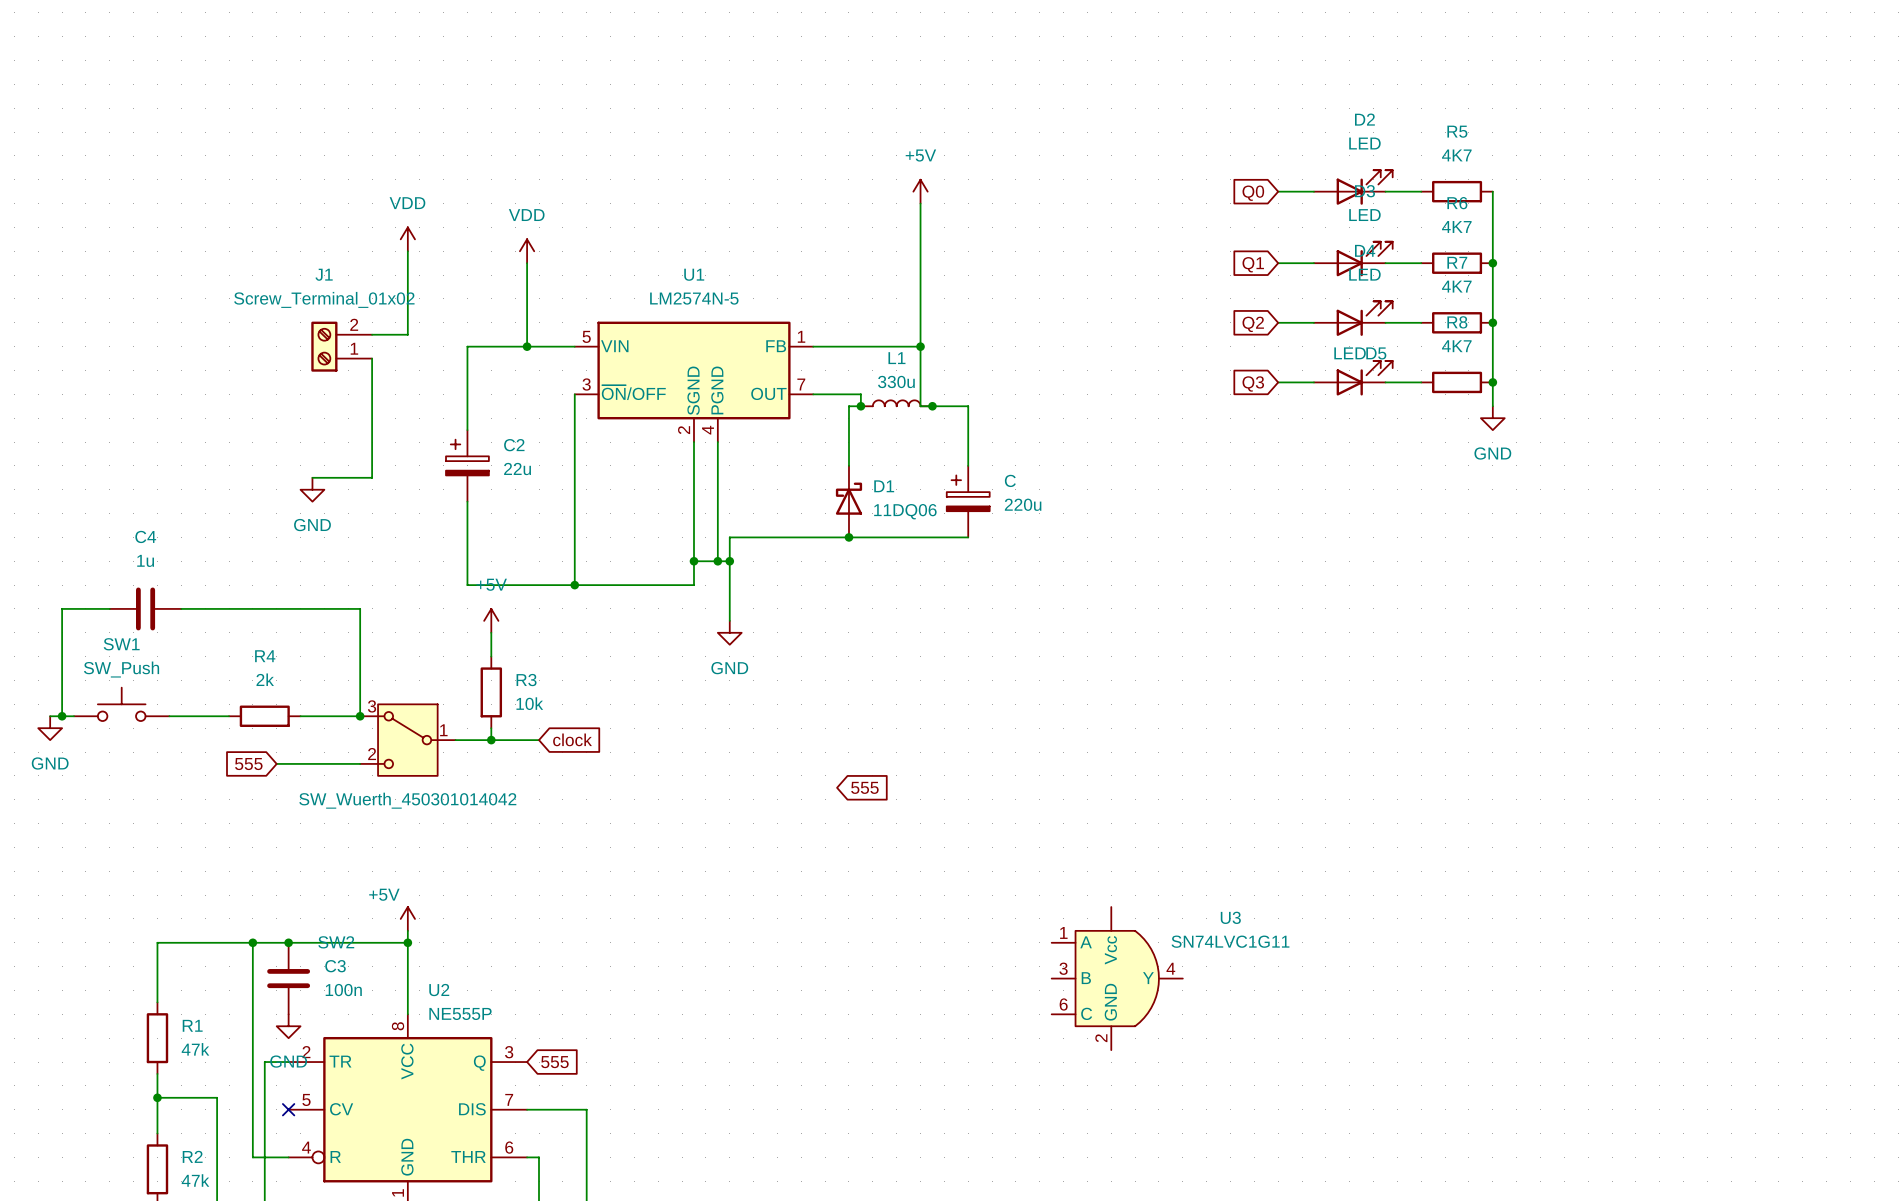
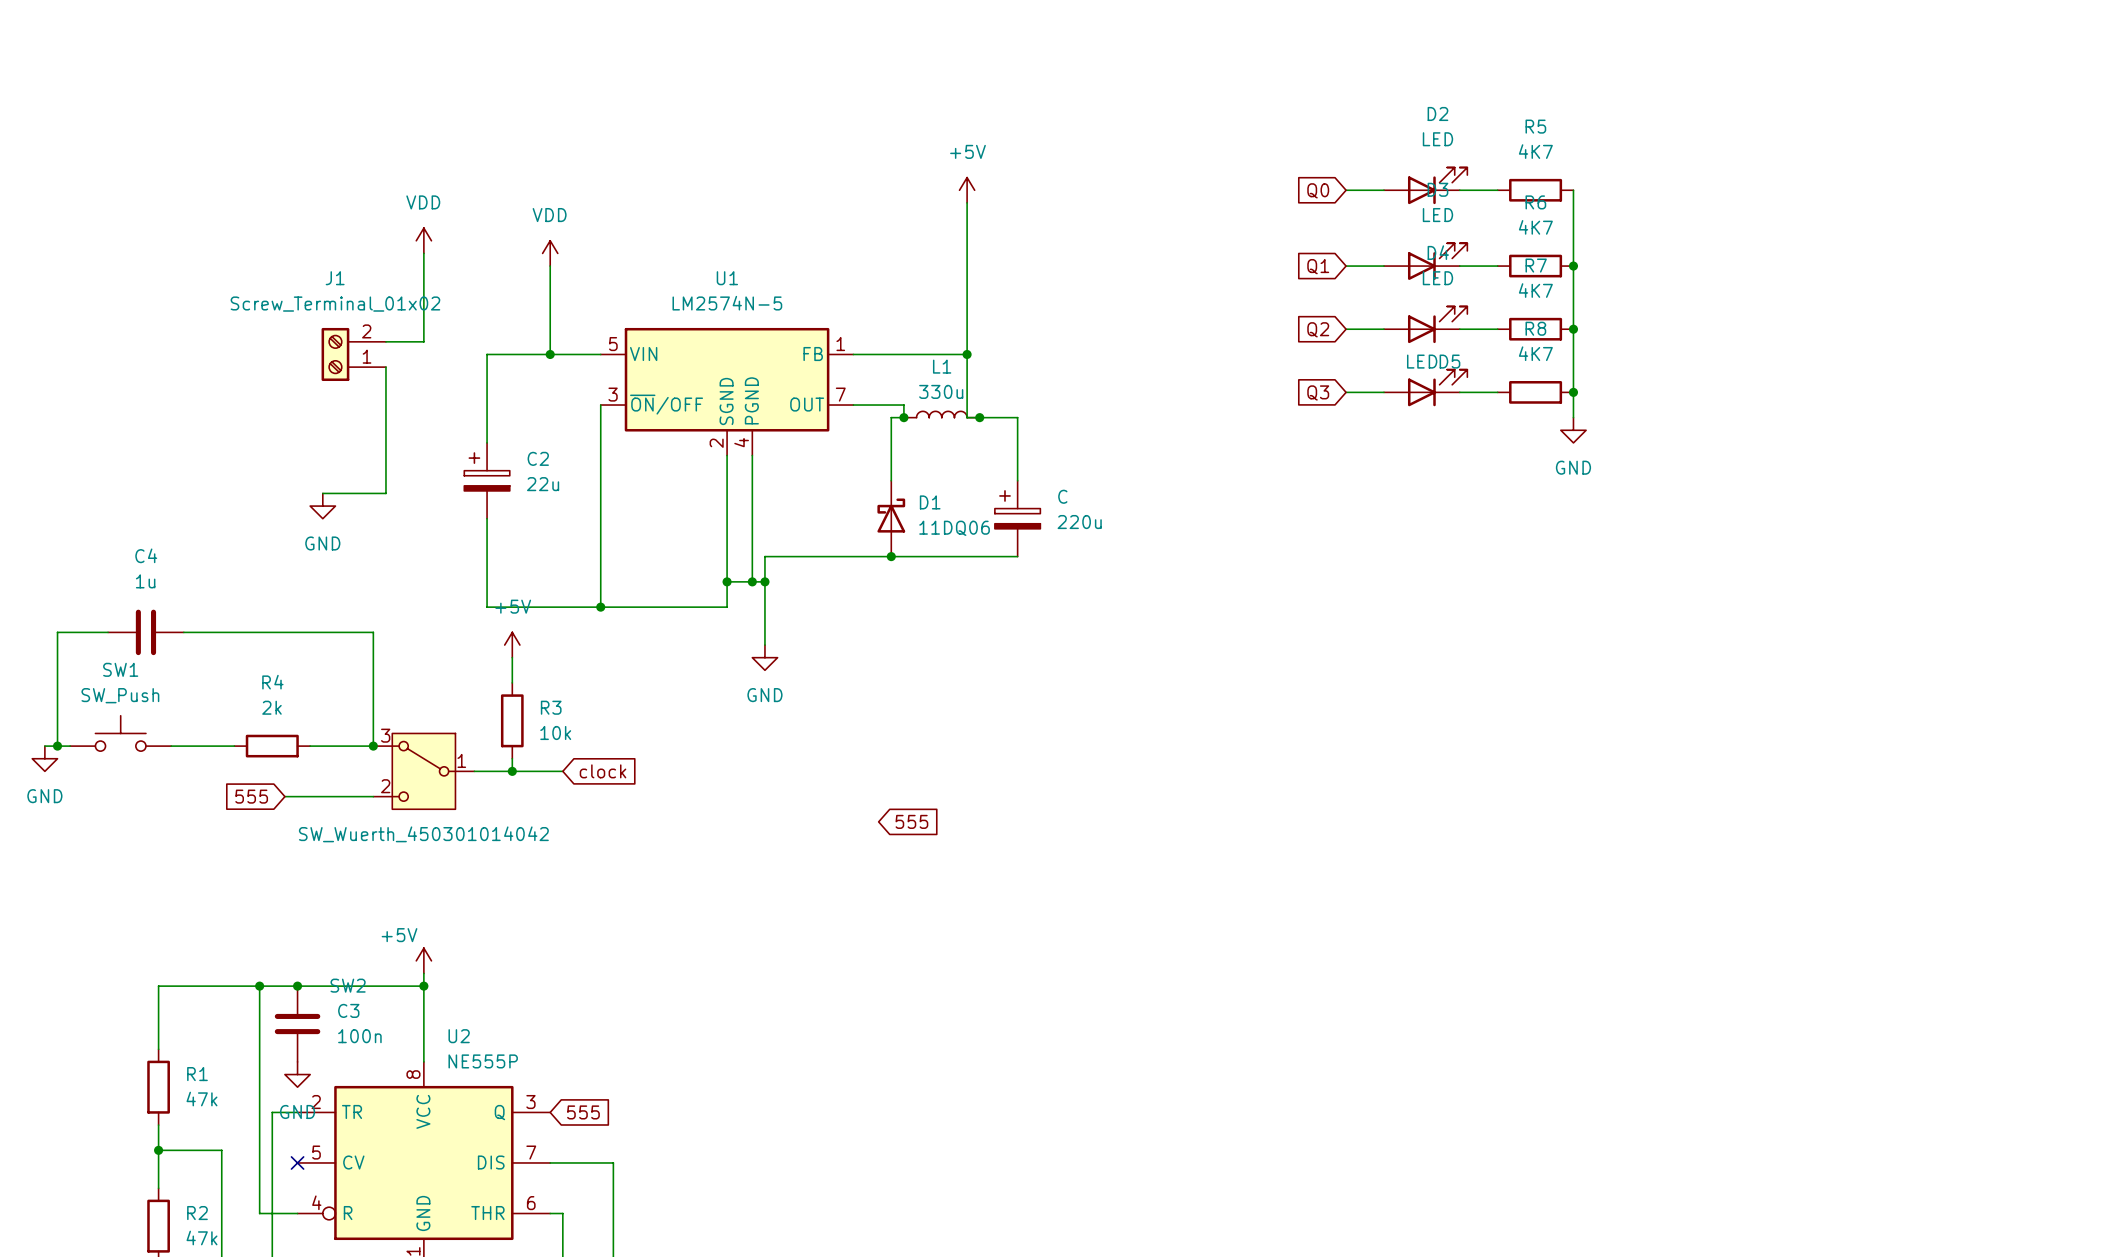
U3: SN74LVC1G11 (1117, 978) -> none

